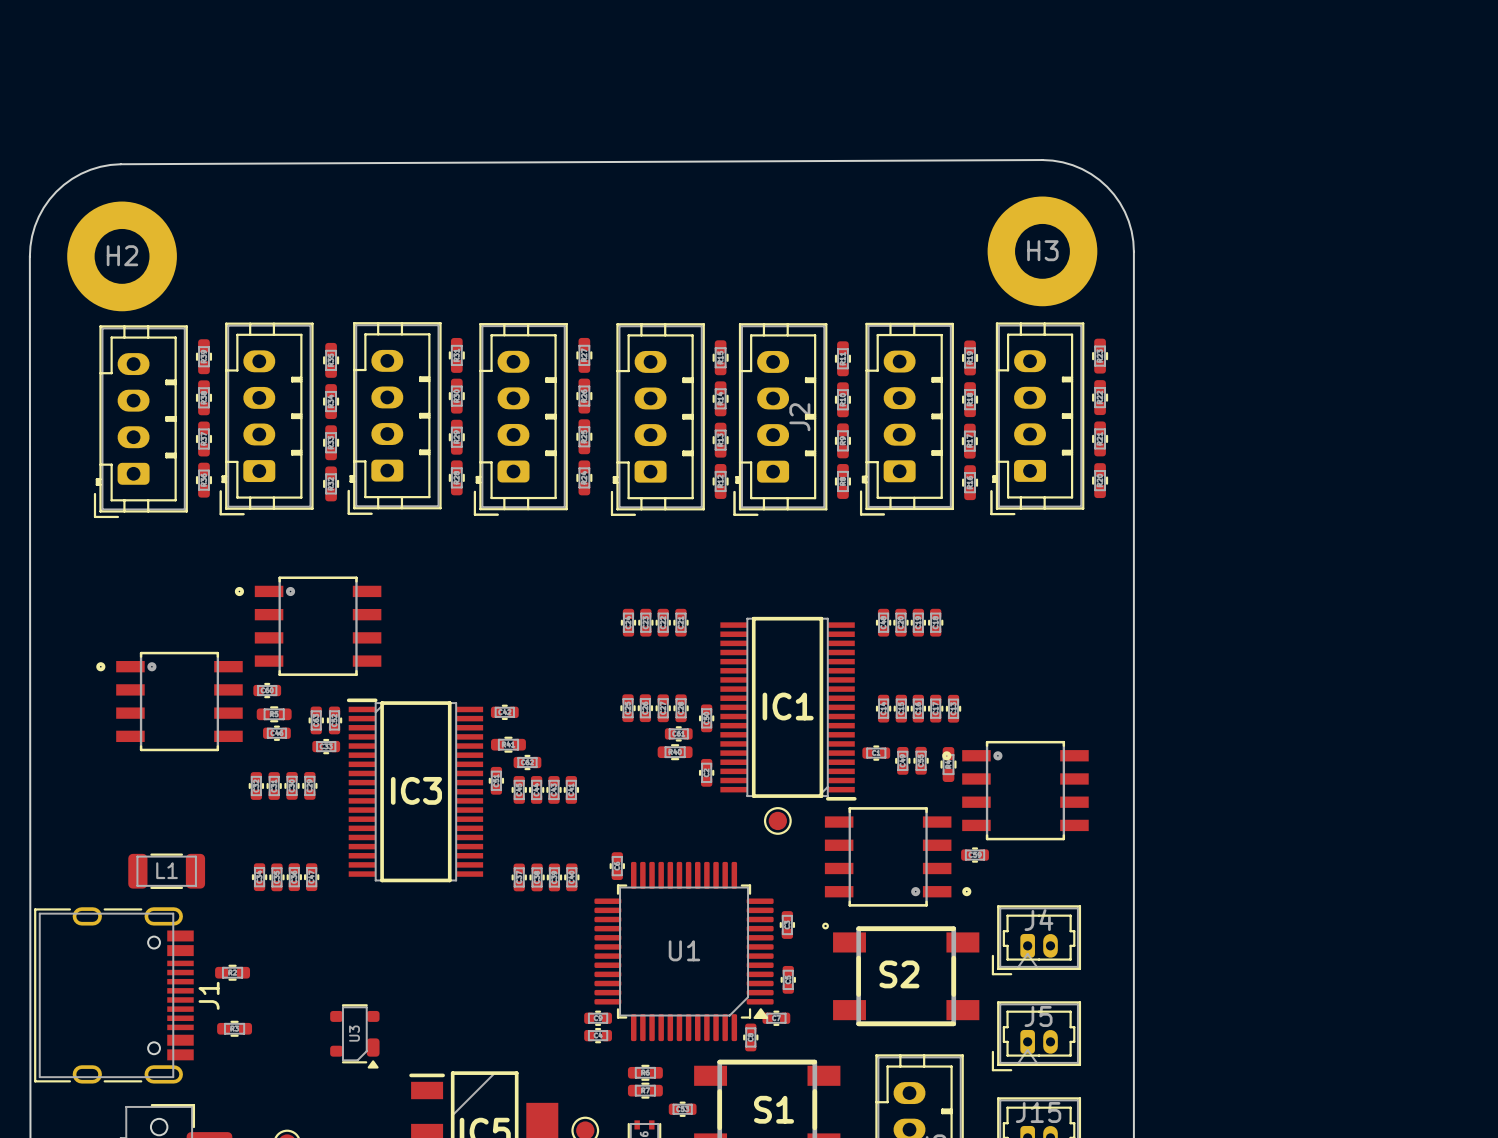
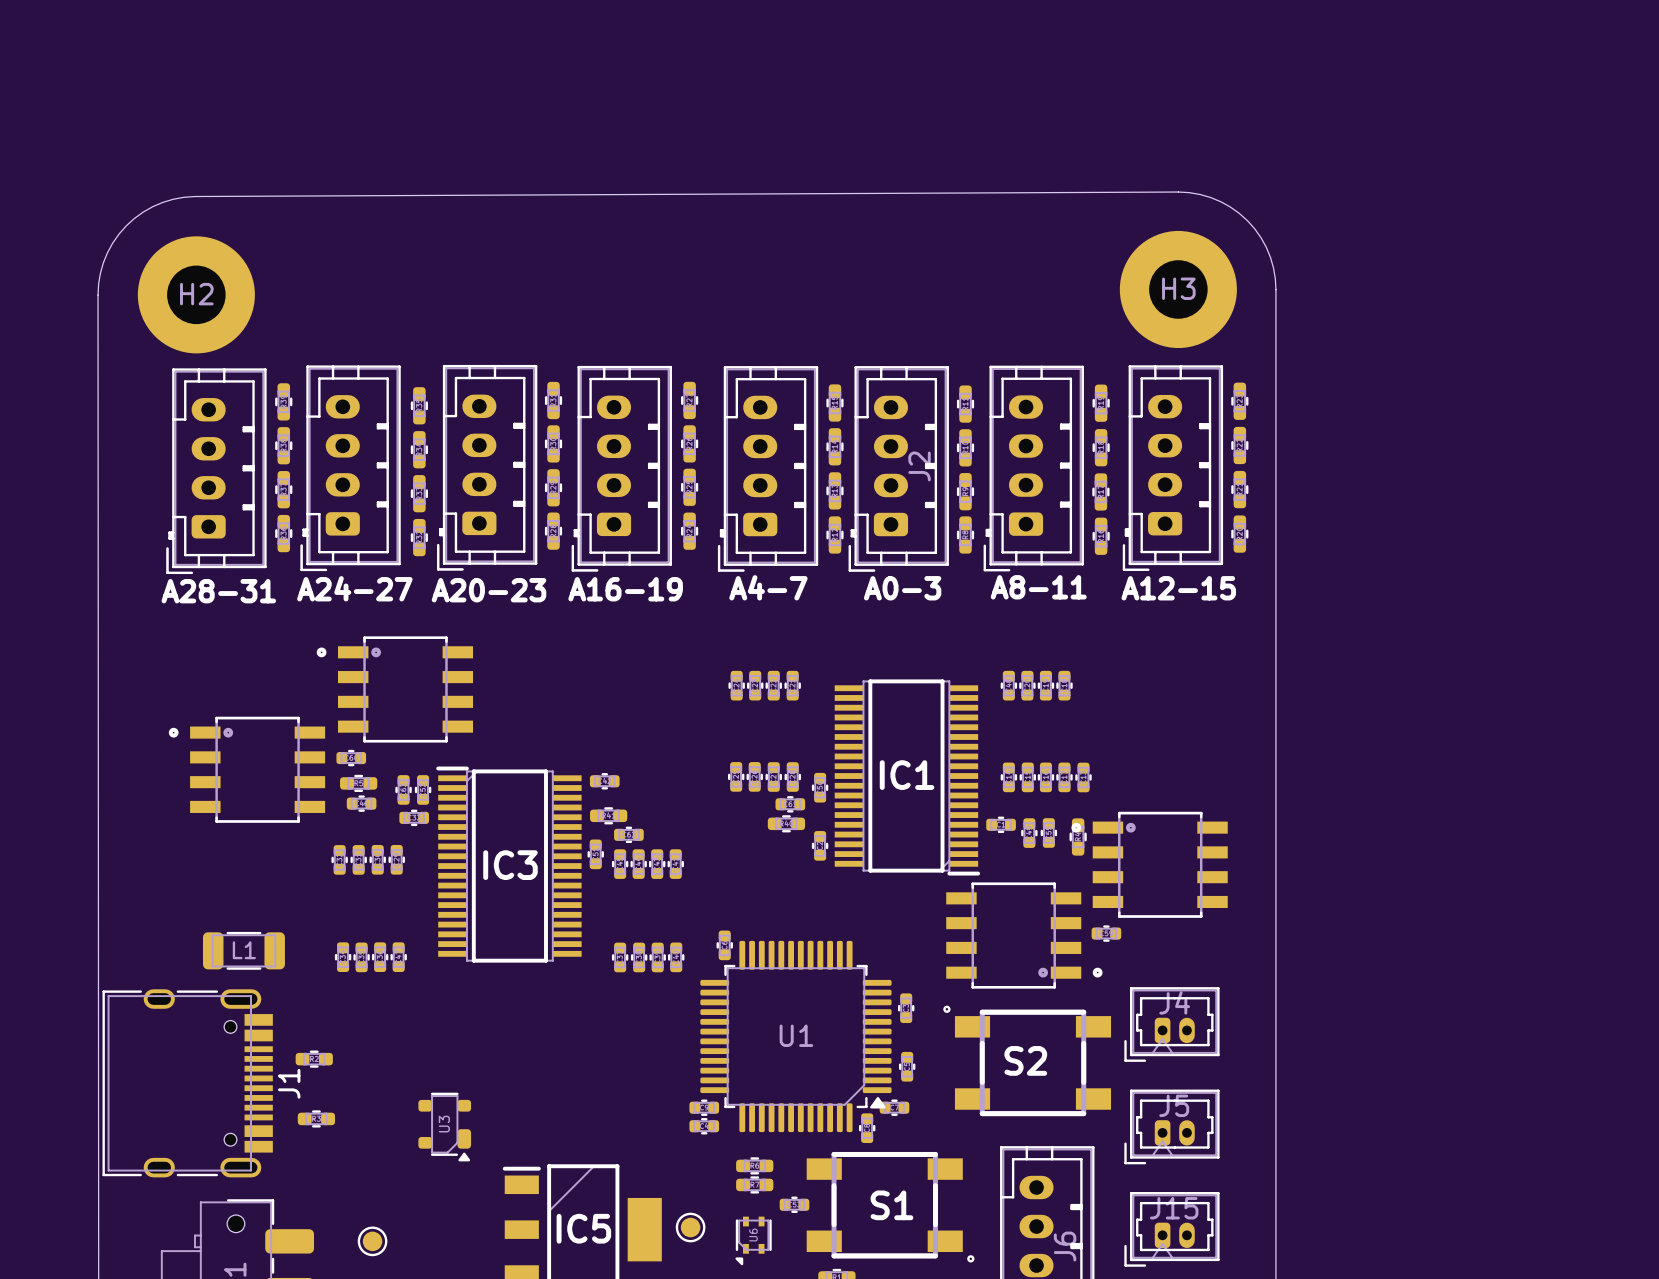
text: none -> A4-7 (768, 587)
text: none -> A8-11 (1038, 587)
text: none -> A24-27 (354, 588)
text: none -> A0-3 (902, 588)
text: none -> A12-15 (1178, 588)
text: none -> A16-19 (625, 589)
text: none -> A20-23 (489, 590)
text: none -> A28-31 (218, 591)
part: (777, 820) -> none

